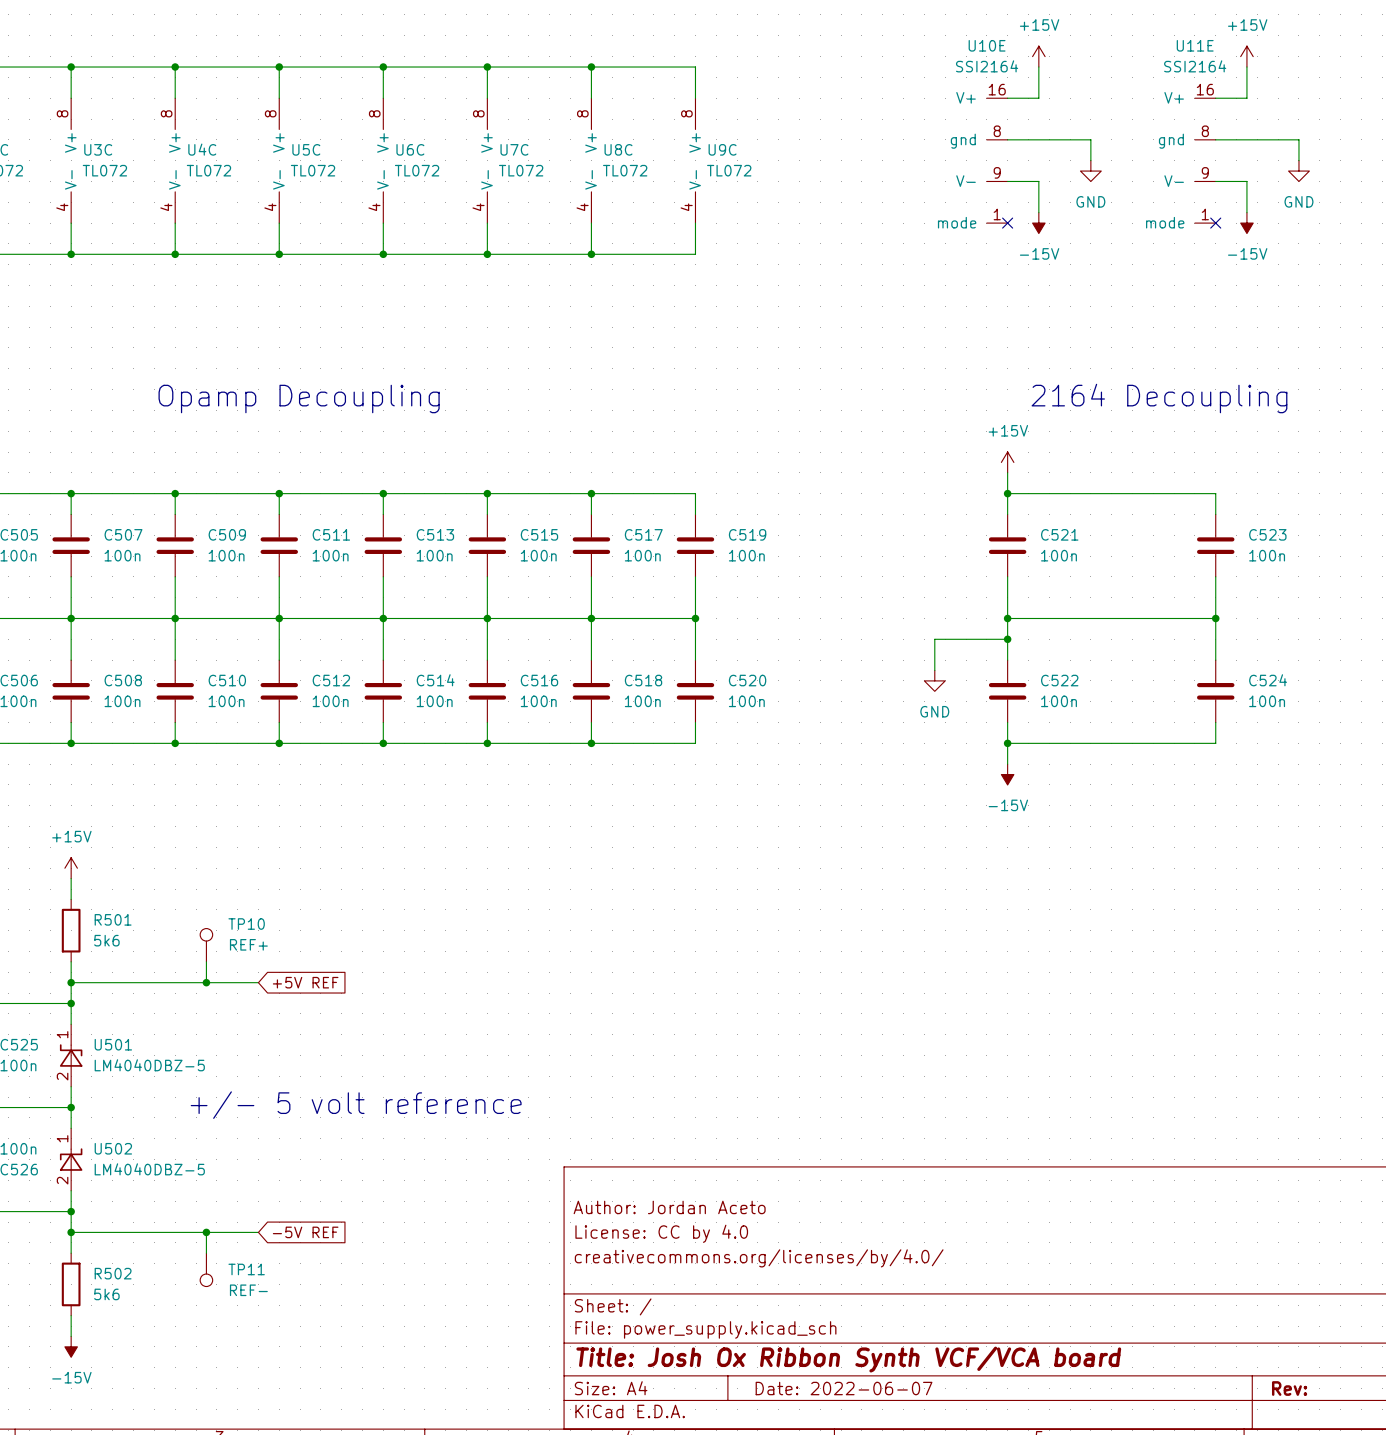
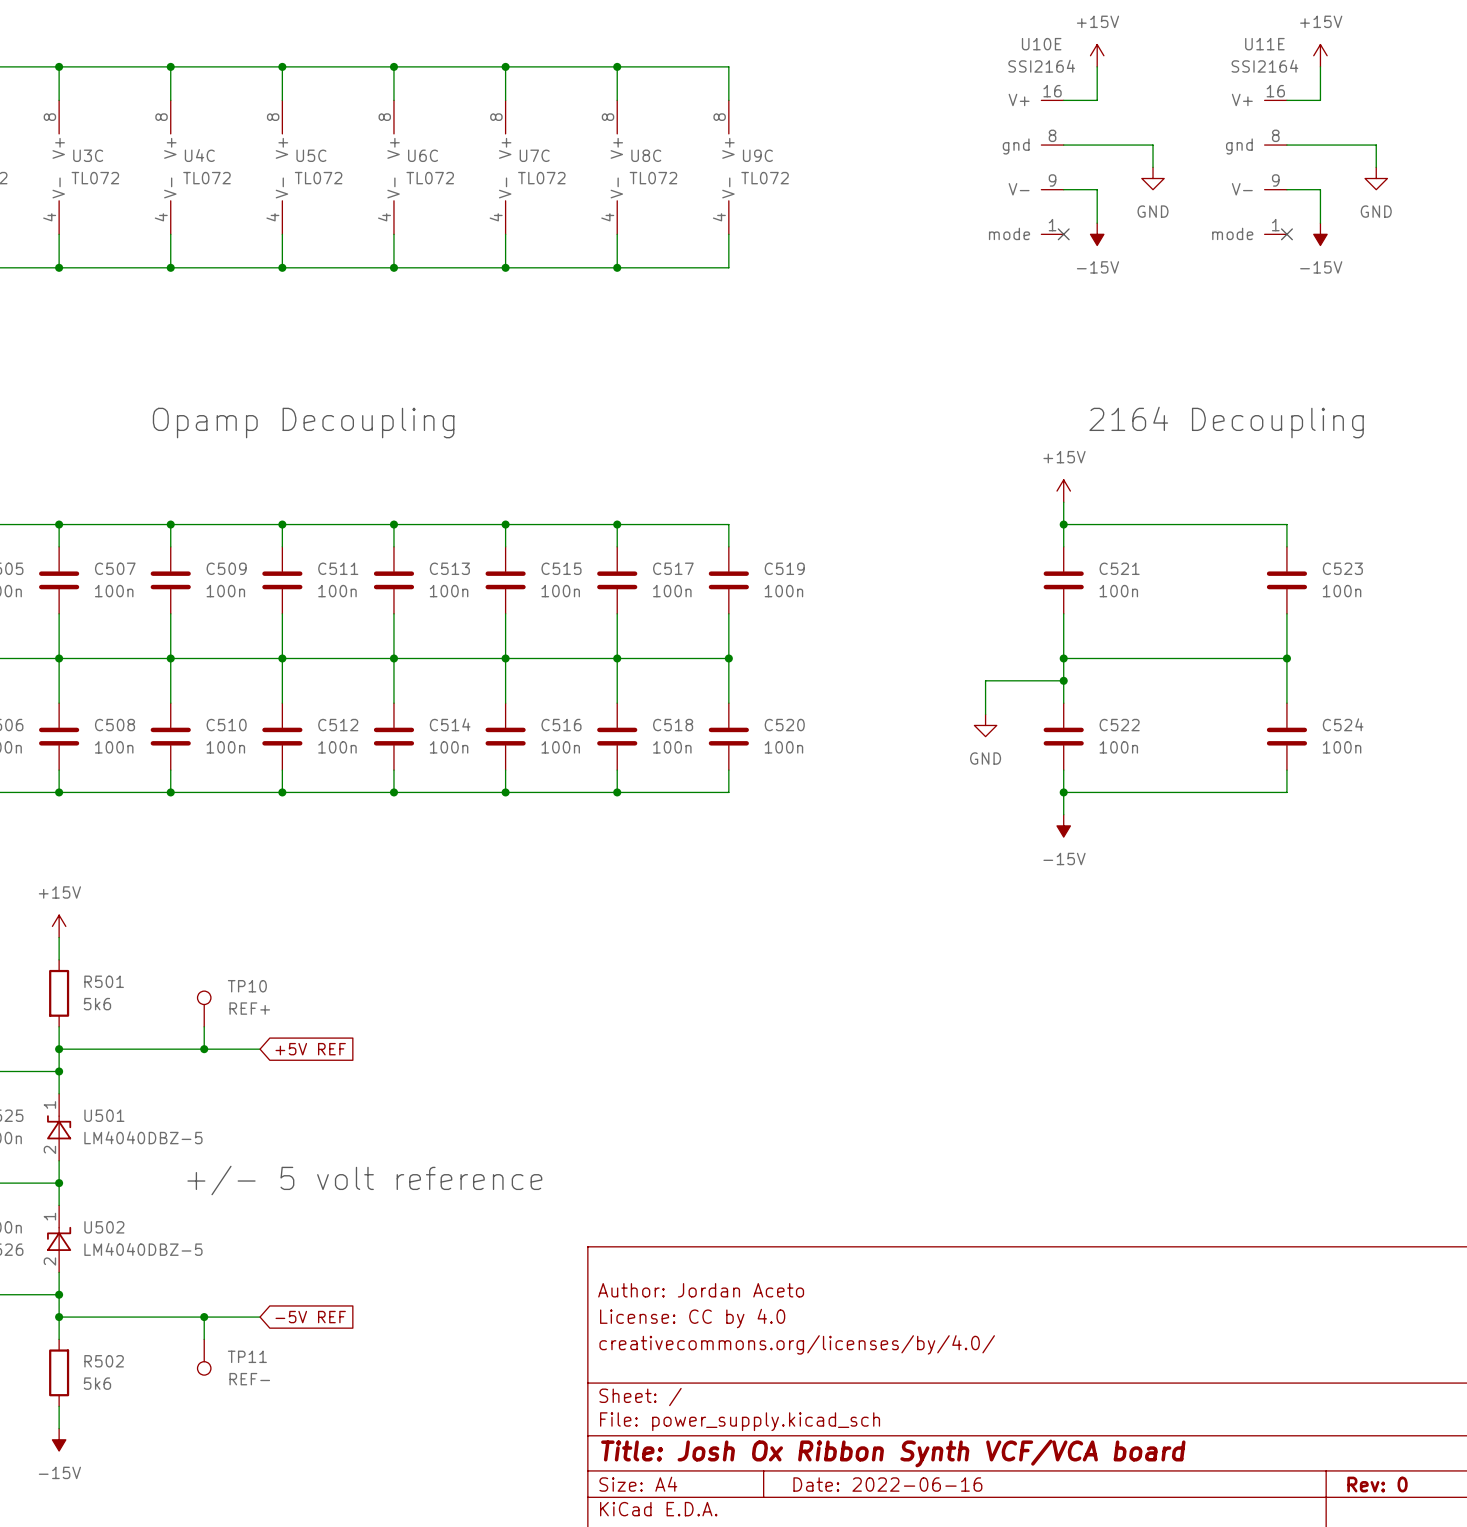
title block: Date: 2022-06-07 (844, 1388) -> Date: 2022-06-16 (887, 1484)
title block: Rev: (1289, 1388) -> Rev: 0 (1377, 1484)

